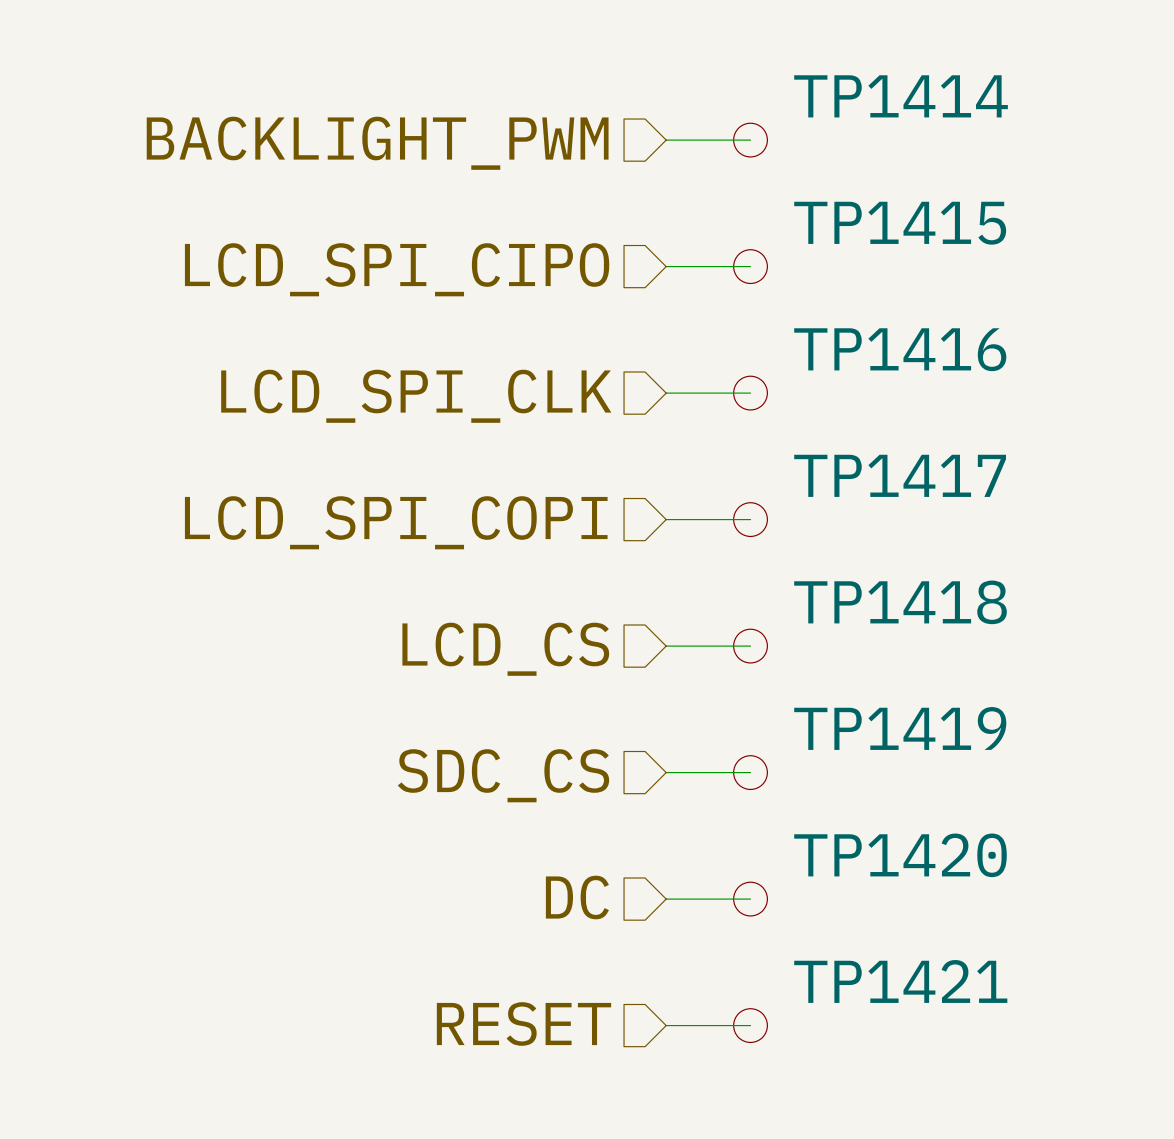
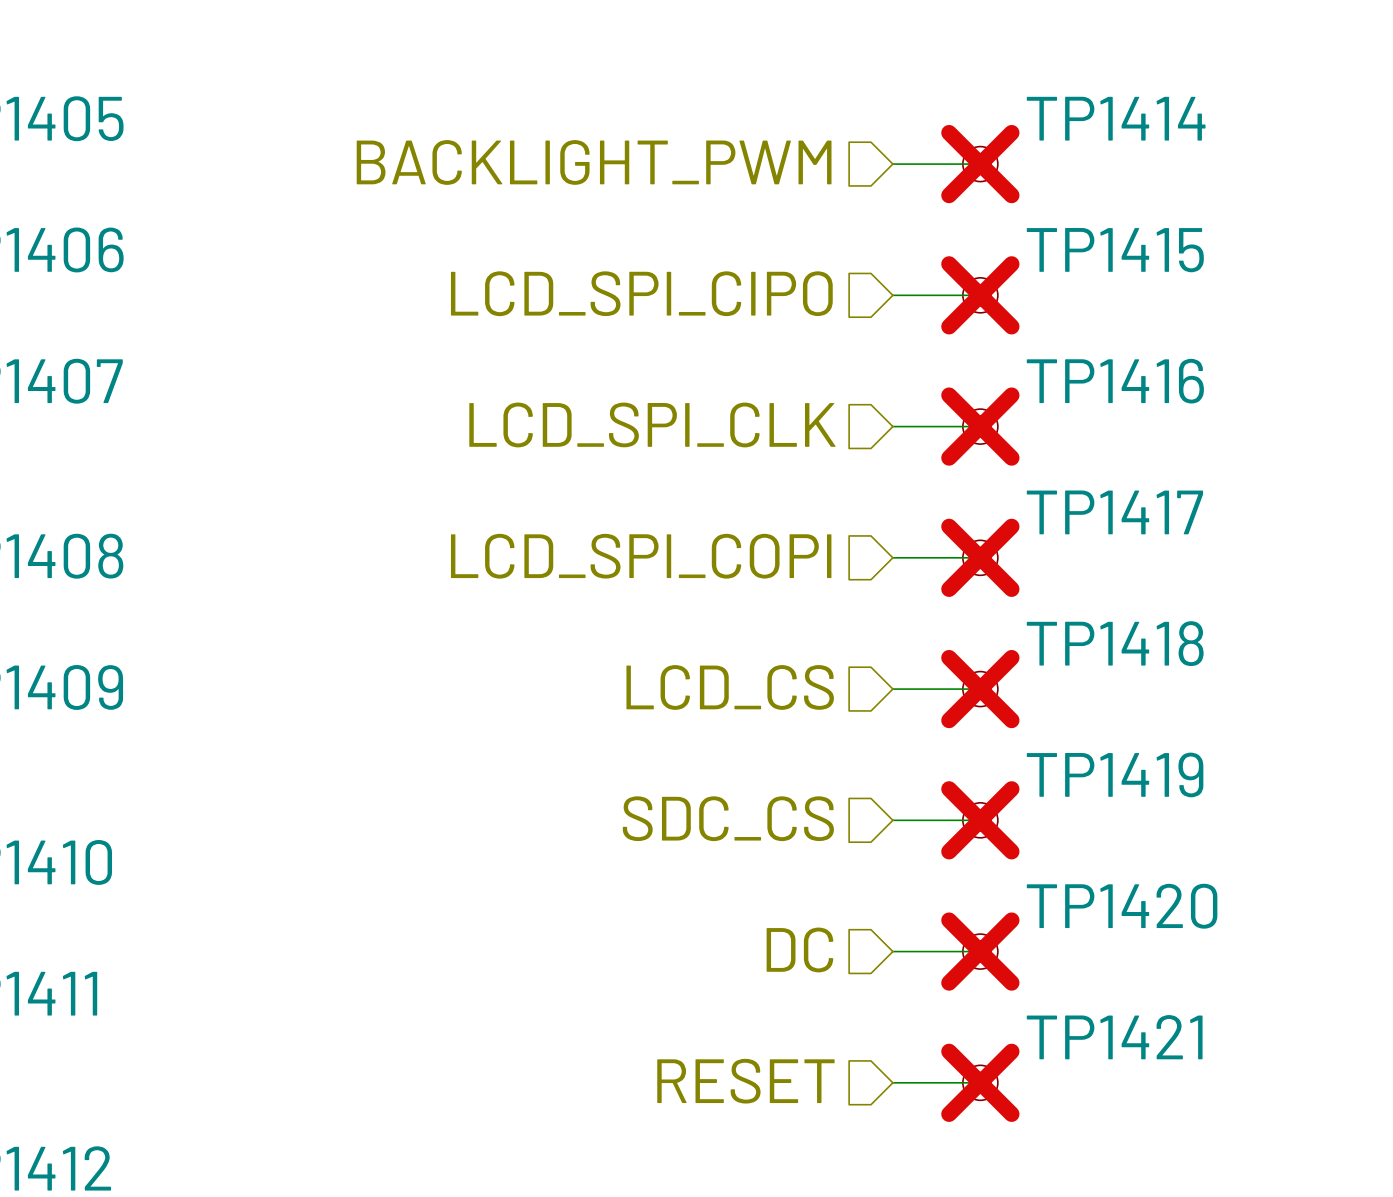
TP1414 do-not-place cross: none -> (980, 164)
TP1415 do-not-place cross: none -> (980, 295)
TP1416 do-not-place cross: none -> (980, 426)
TP1417 do-not-place cross: none -> (980, 557)
TP1418 do-not-place cross: none -> (980, 689)
TP1419 do-not-place cross: none -> (980, 820)
TP1420 do-not-place cross: none -> (980, 951)
TP1421 do-not-place cross: none -> (980, 1082)

